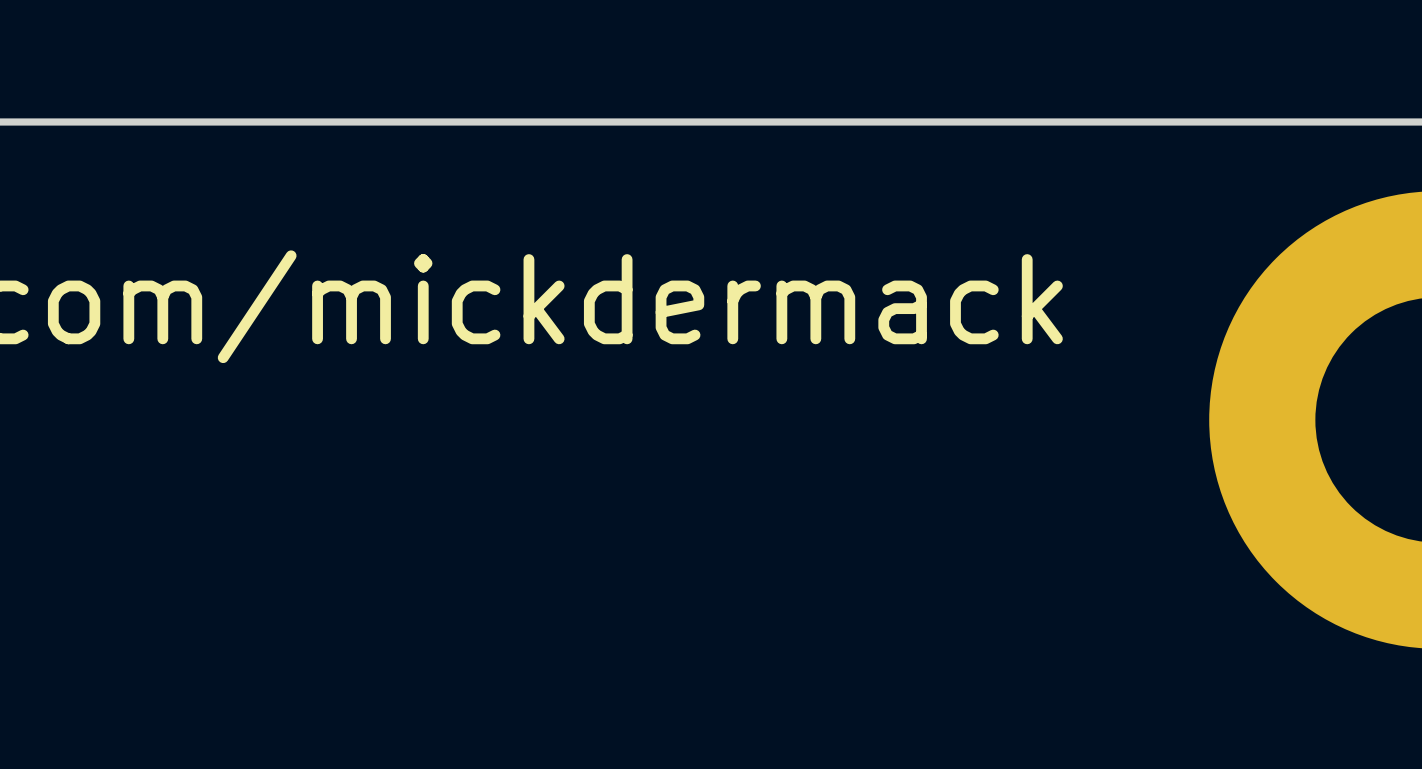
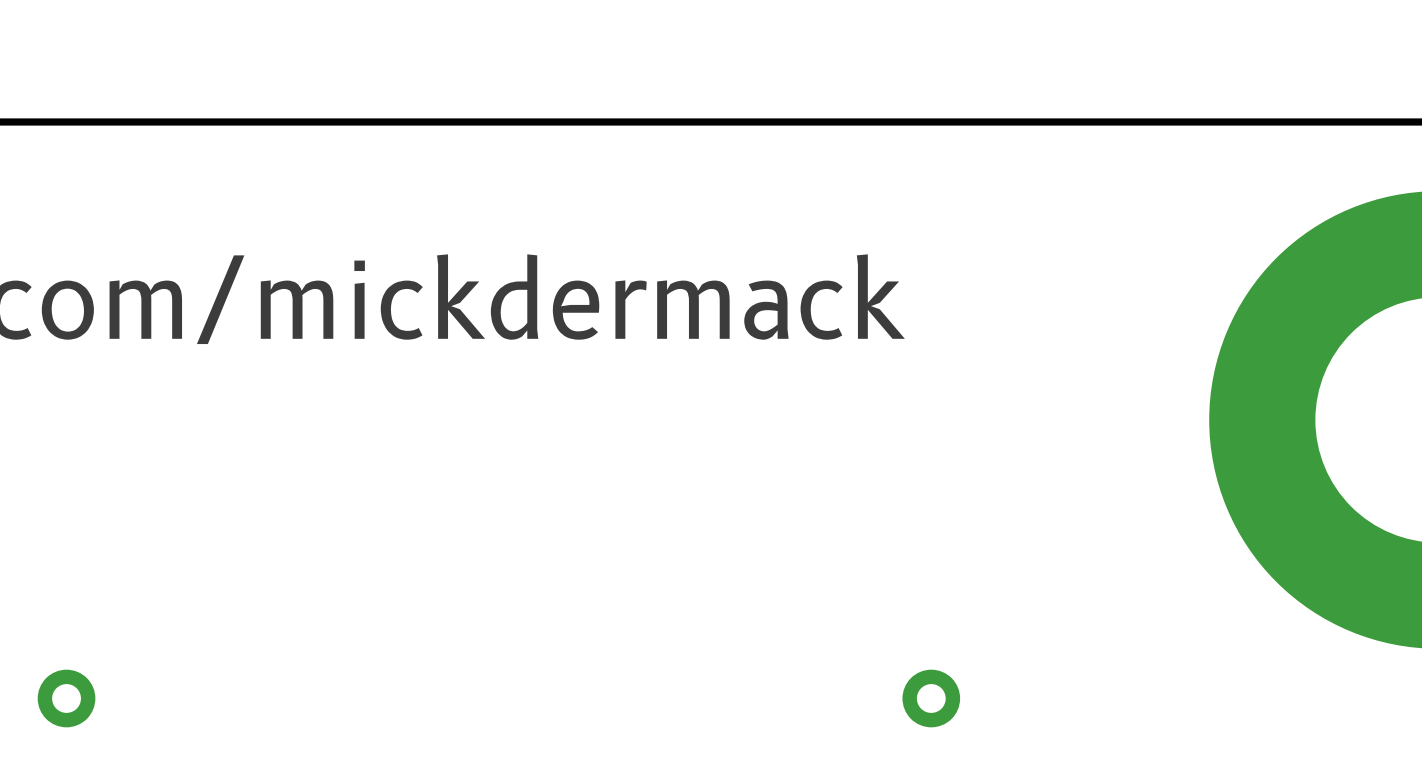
via: none -> (66, 698)
via: none -> (931, 698)

